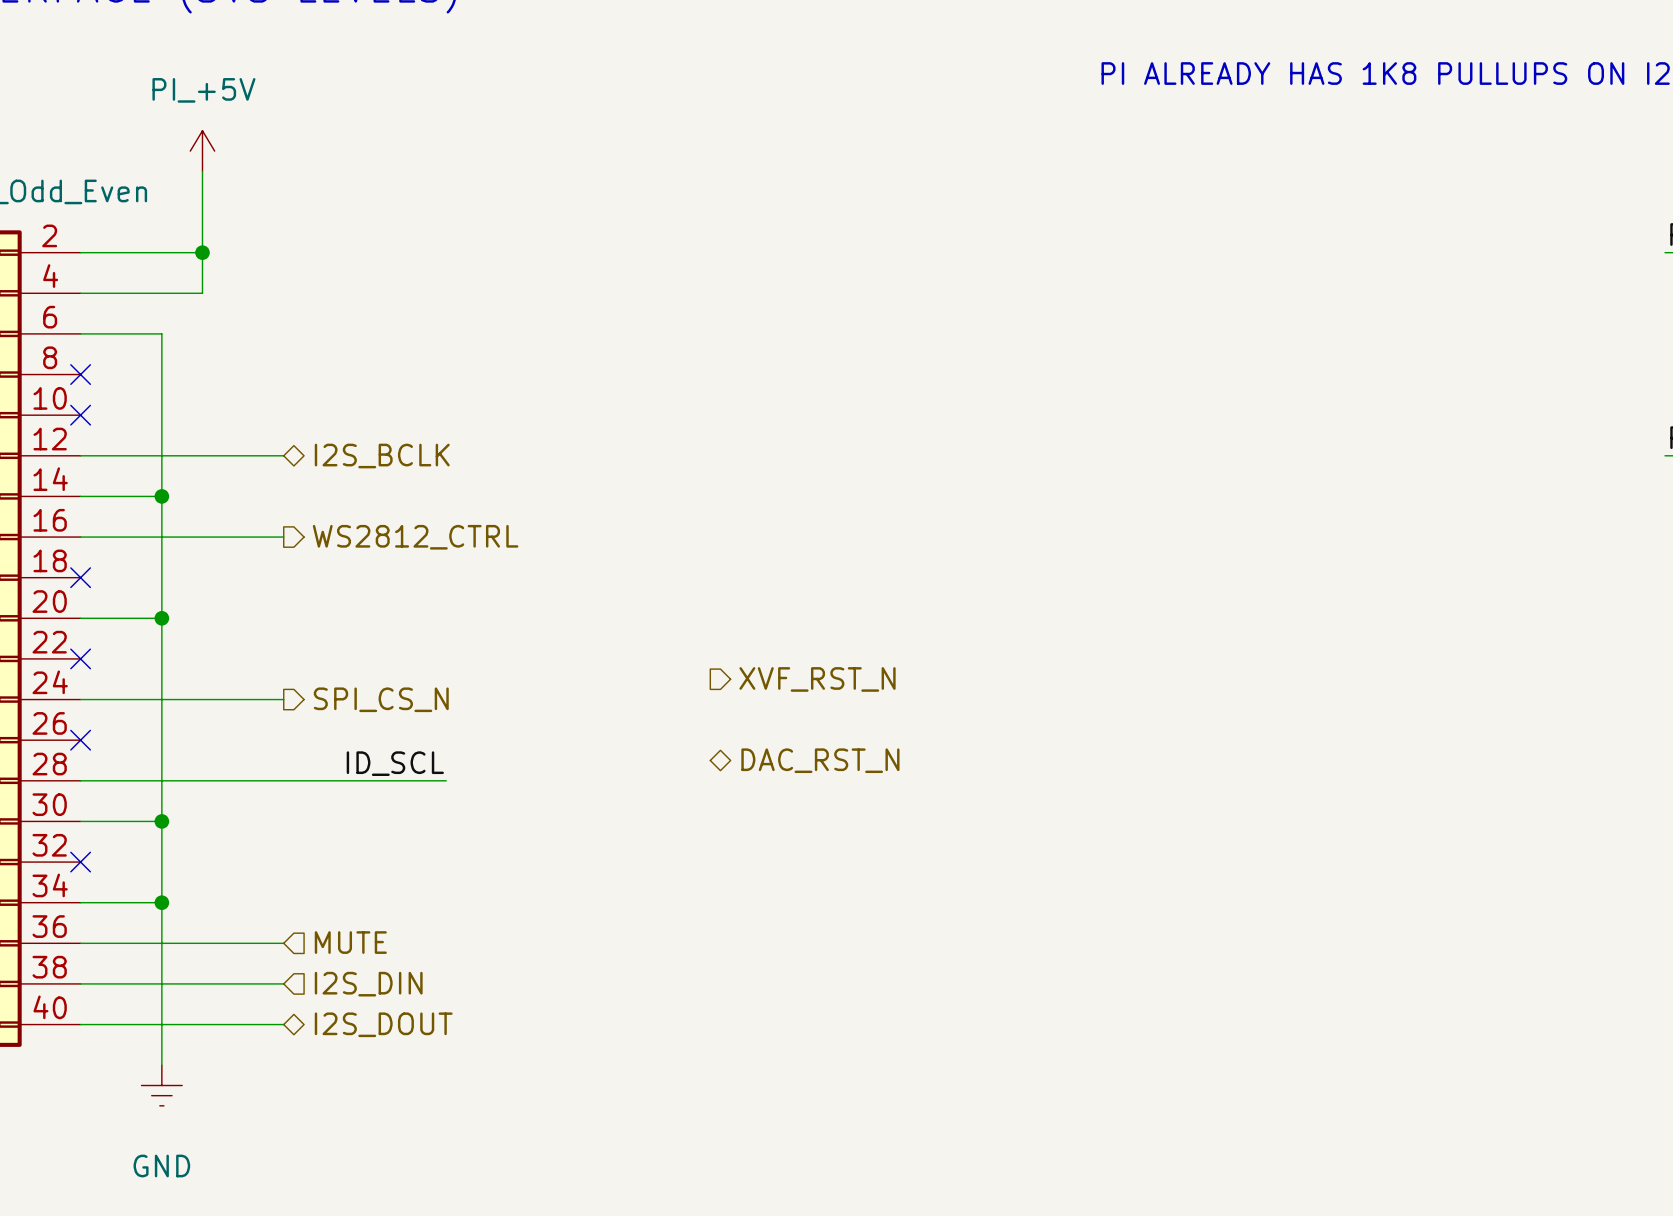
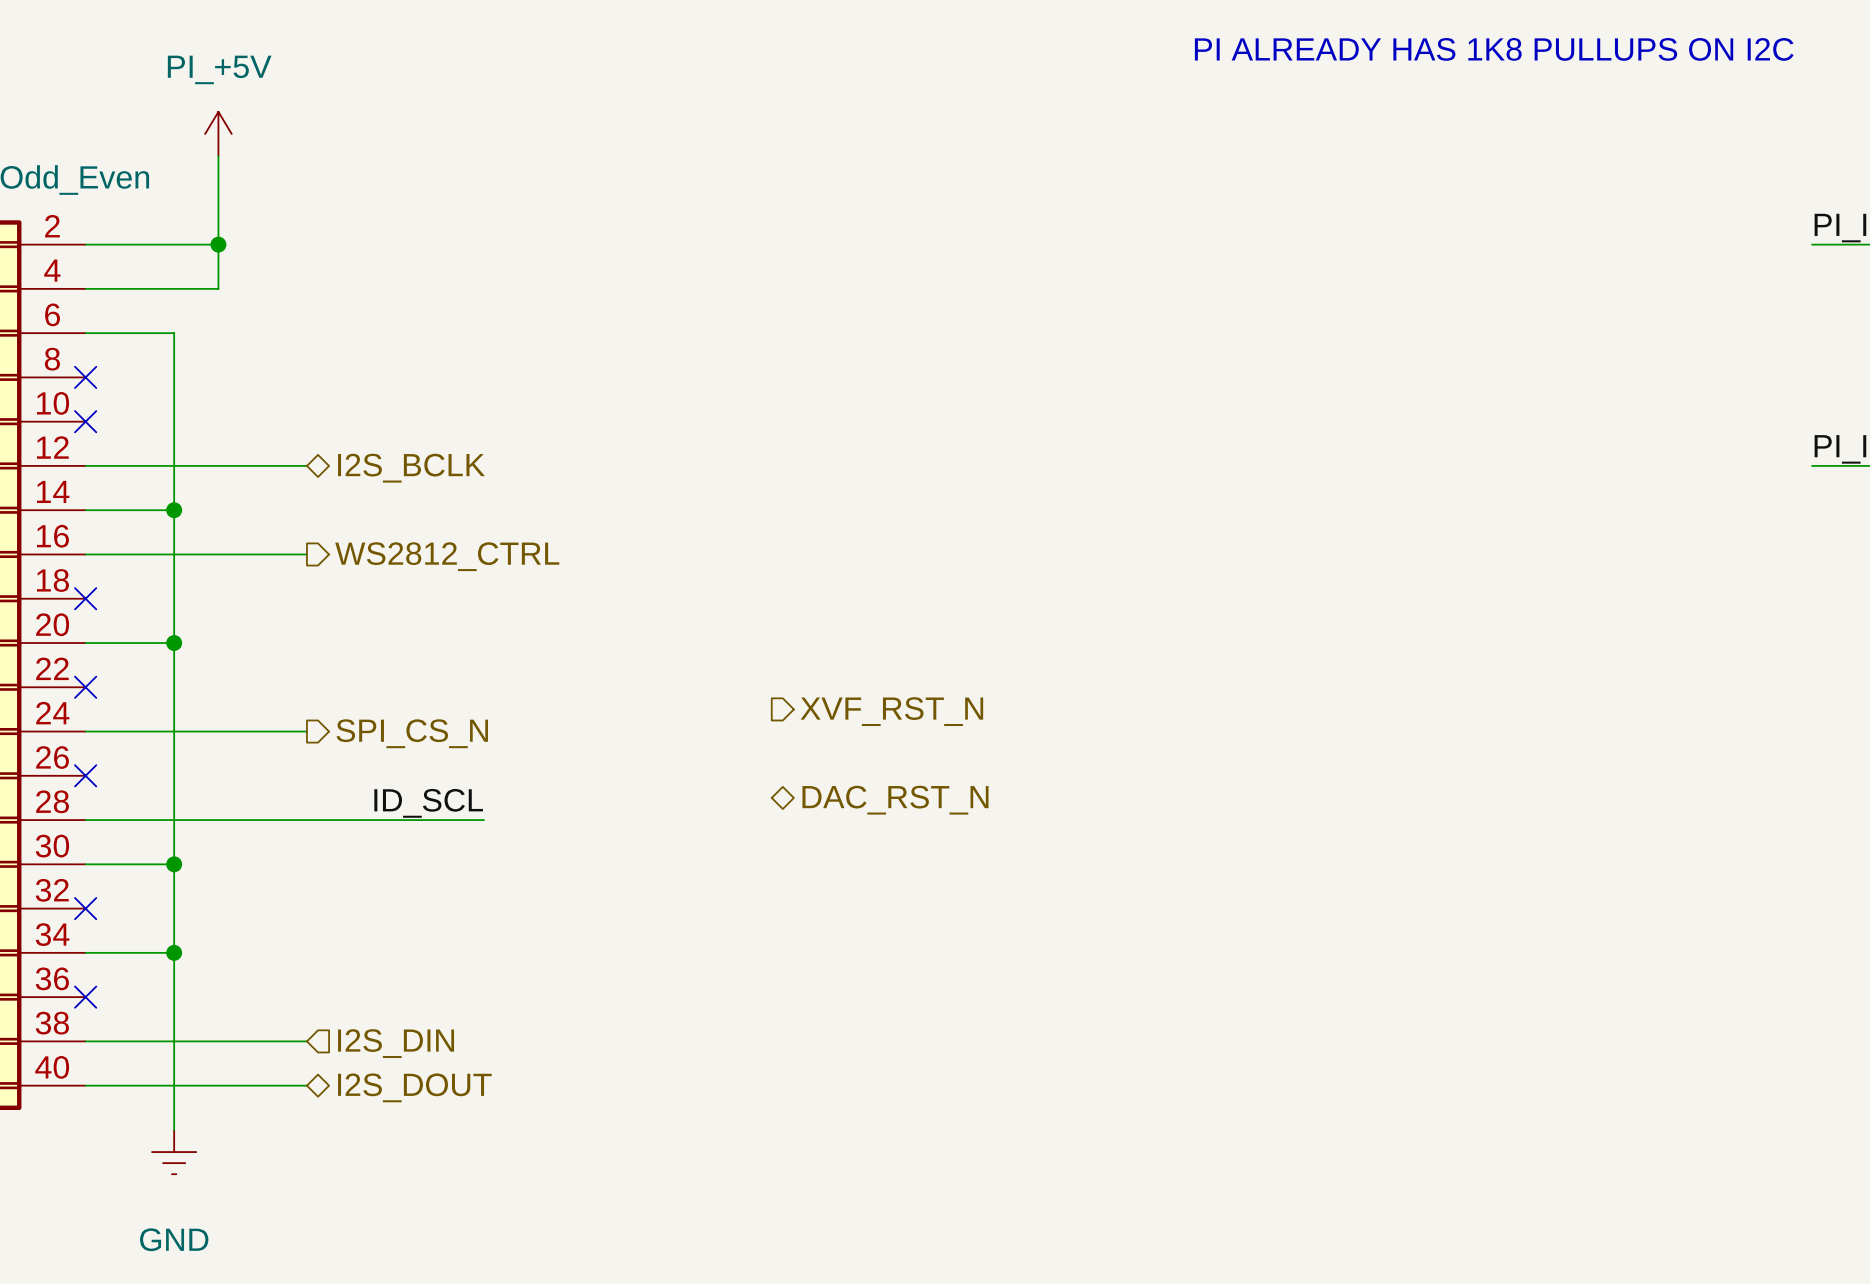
hierarchical label: MUTE (350, 942) -> none
wire: (80, 943) (283, 943) -> none
no-connect mark: none -> (85, 997)

